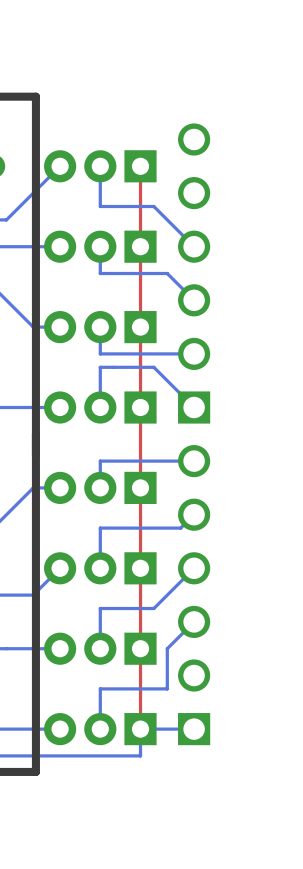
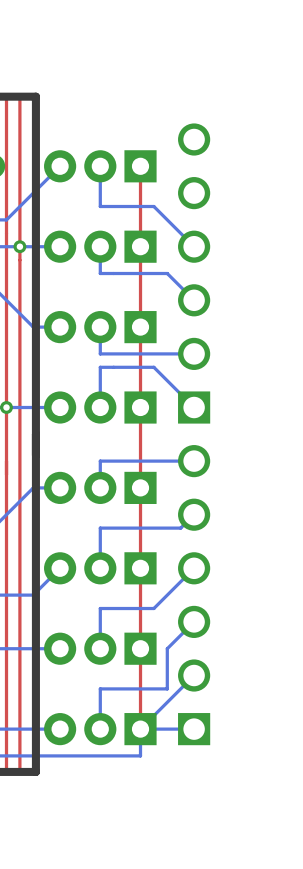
top track: none -> (6, 99) (6, 769)
top track: none -> (19, 99) (19, 769)
via: none -> (19, 246)
via: none -> (6, 407)
bottom track: none -> (194, 675) (140, 729)

